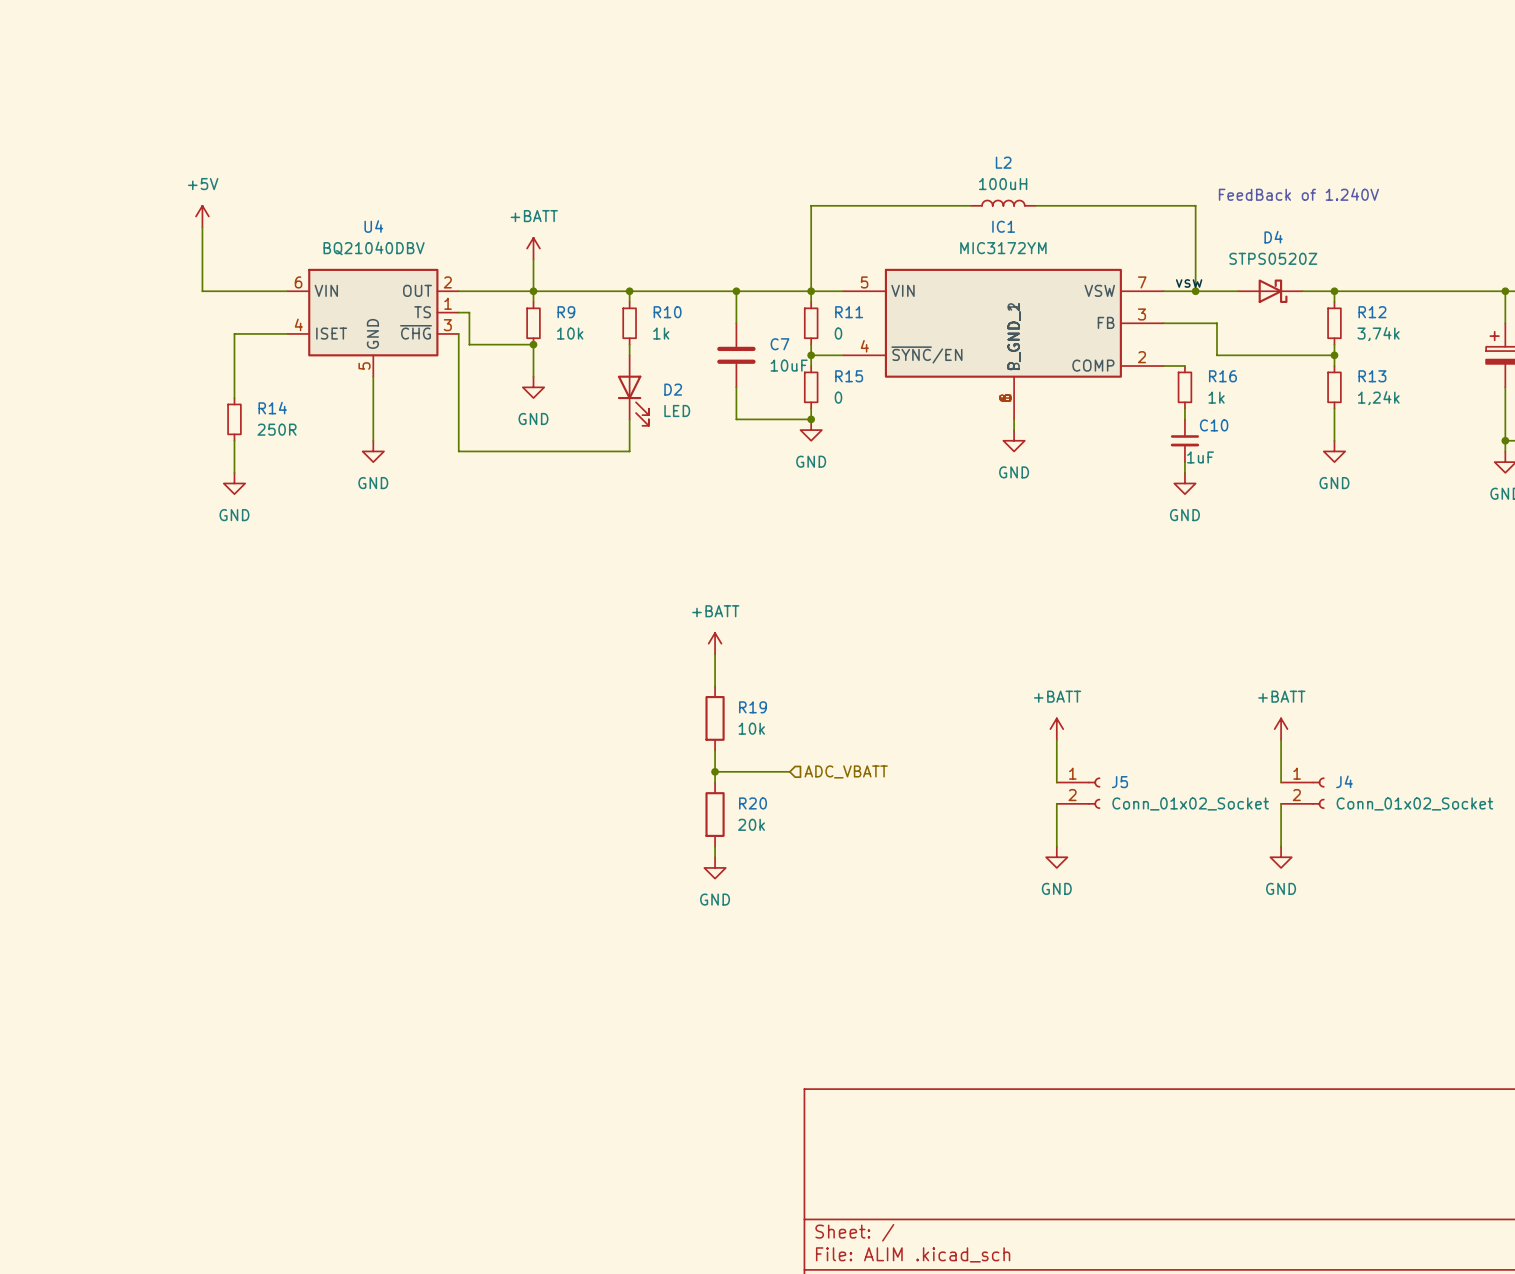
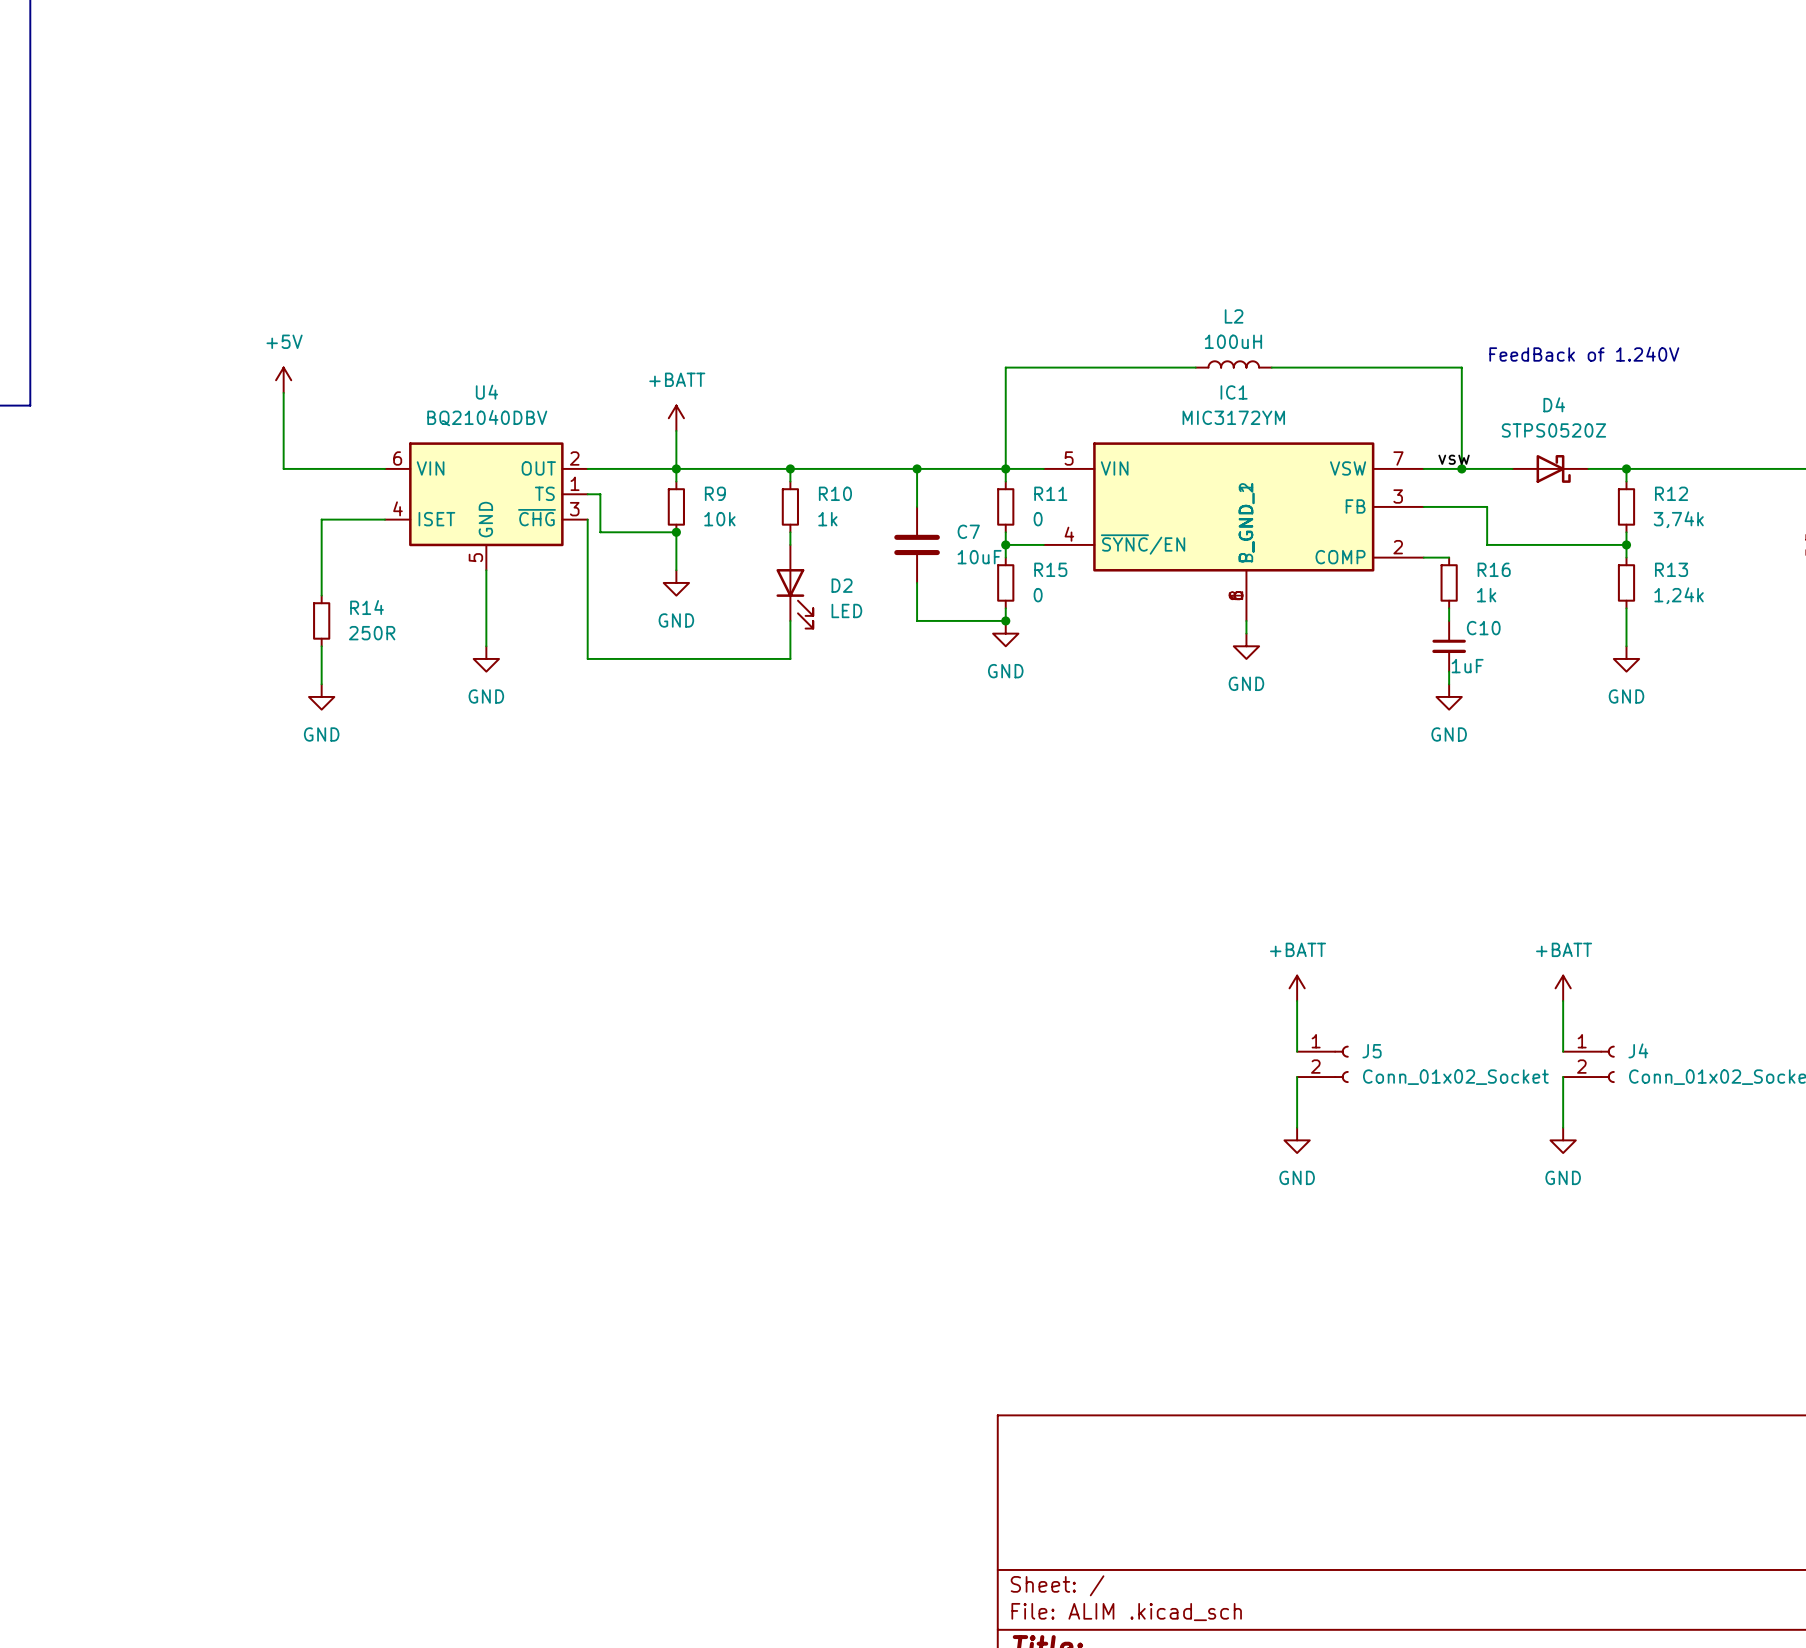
power symbol: +BATT (715, 643) -> none
wire: (715, 654) (715, 686) -> none
R19: 10k (715, 718) -> none
wire: (715, 750) (715, 782) -> none
wire: (715, 771) (789, 771) -> none
junction: (715, 771) -> none
hierarchical label: ADC_VBATT (846, 771) -> none
R20: 20k (715, 814) -> none
wire: (715, 846) (715, 857) -> none
power symbol: GND (715, 867) -> none

